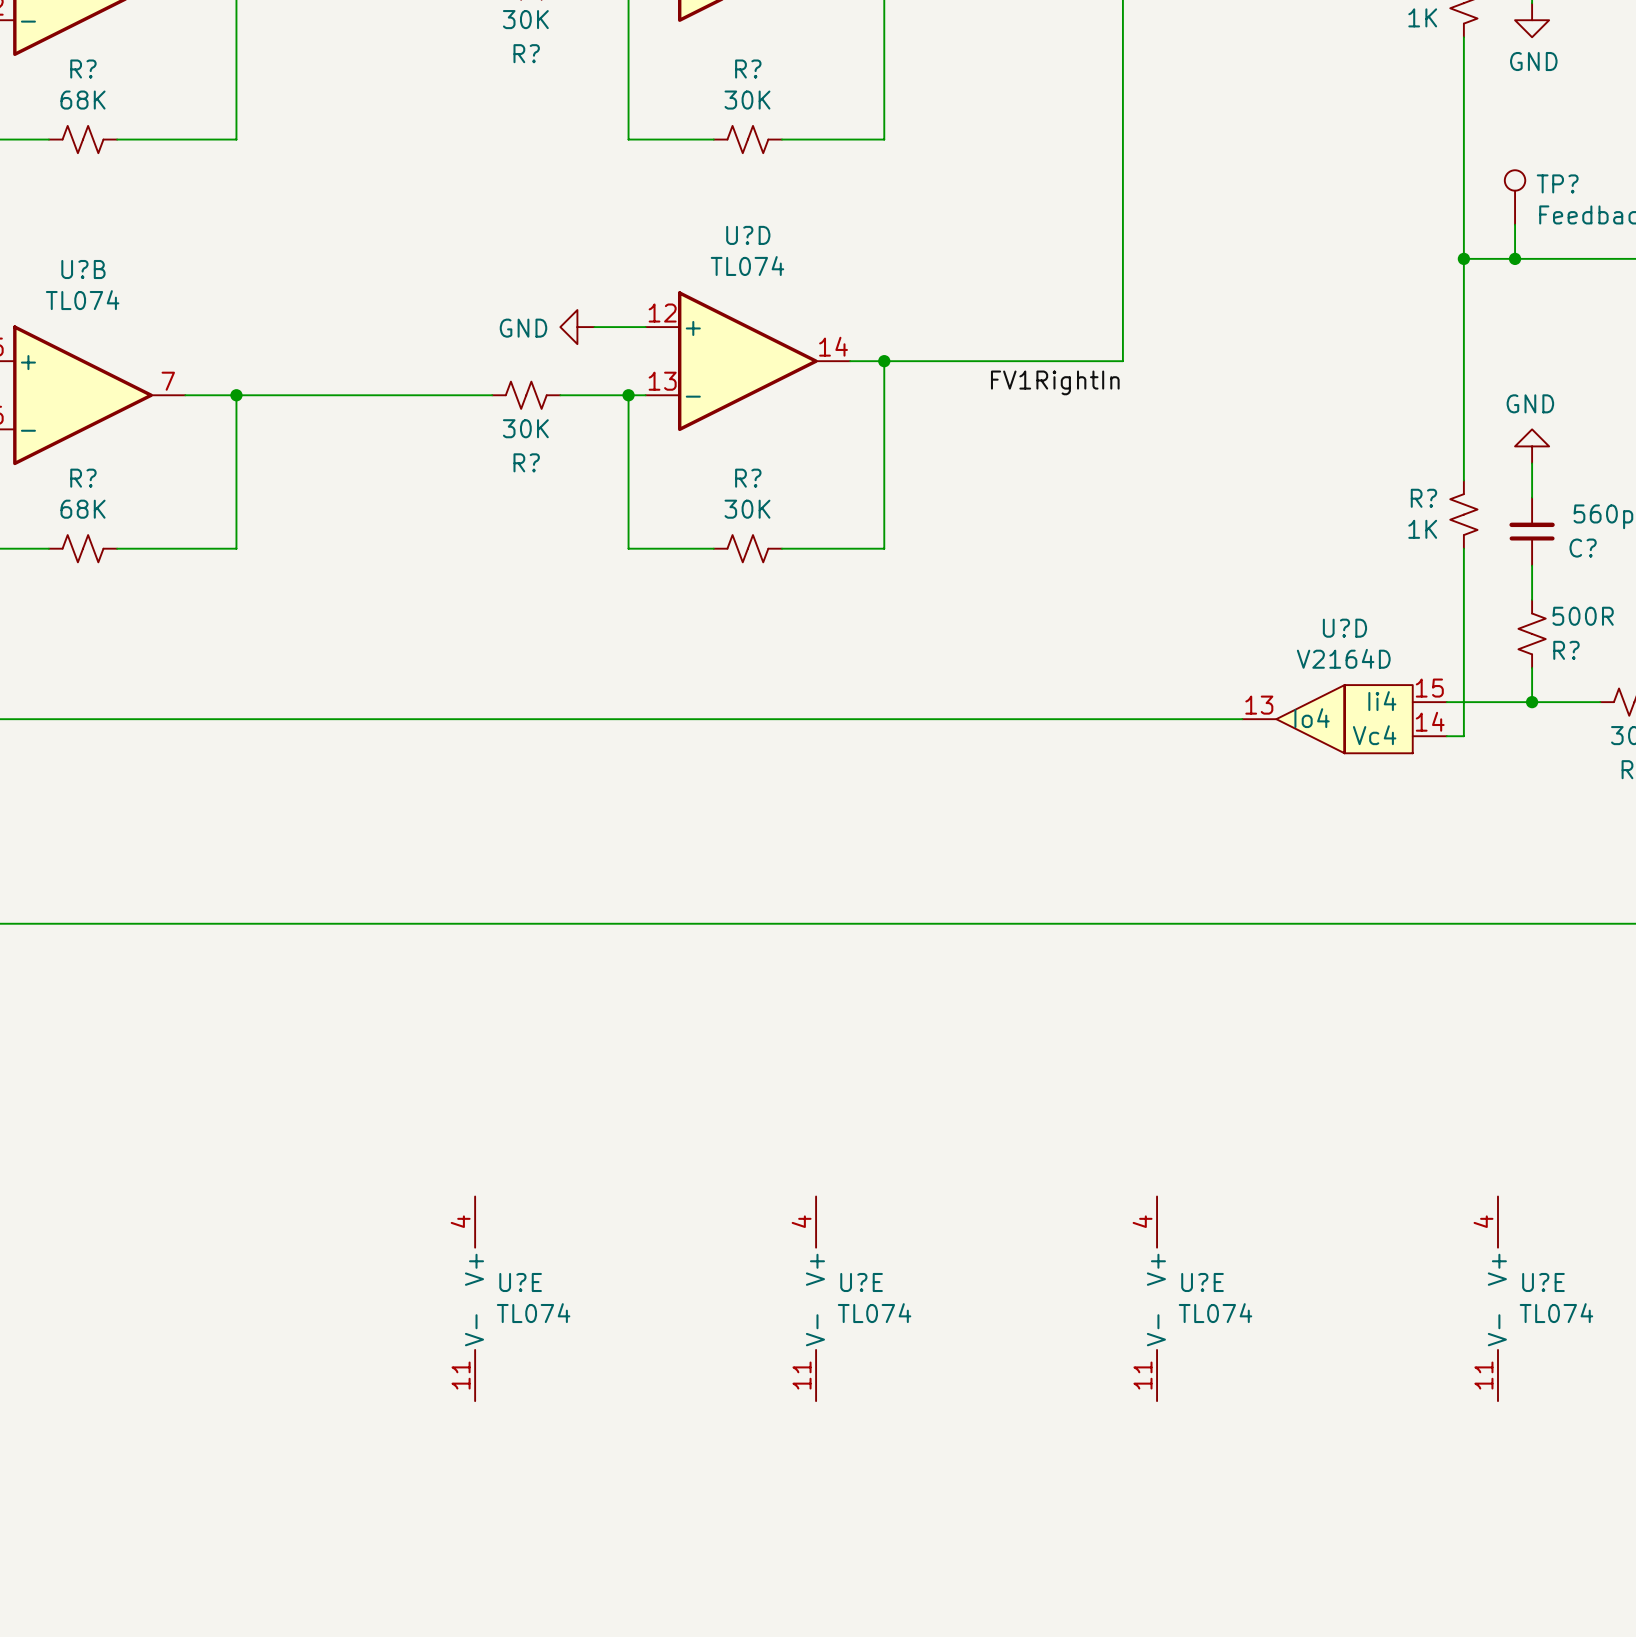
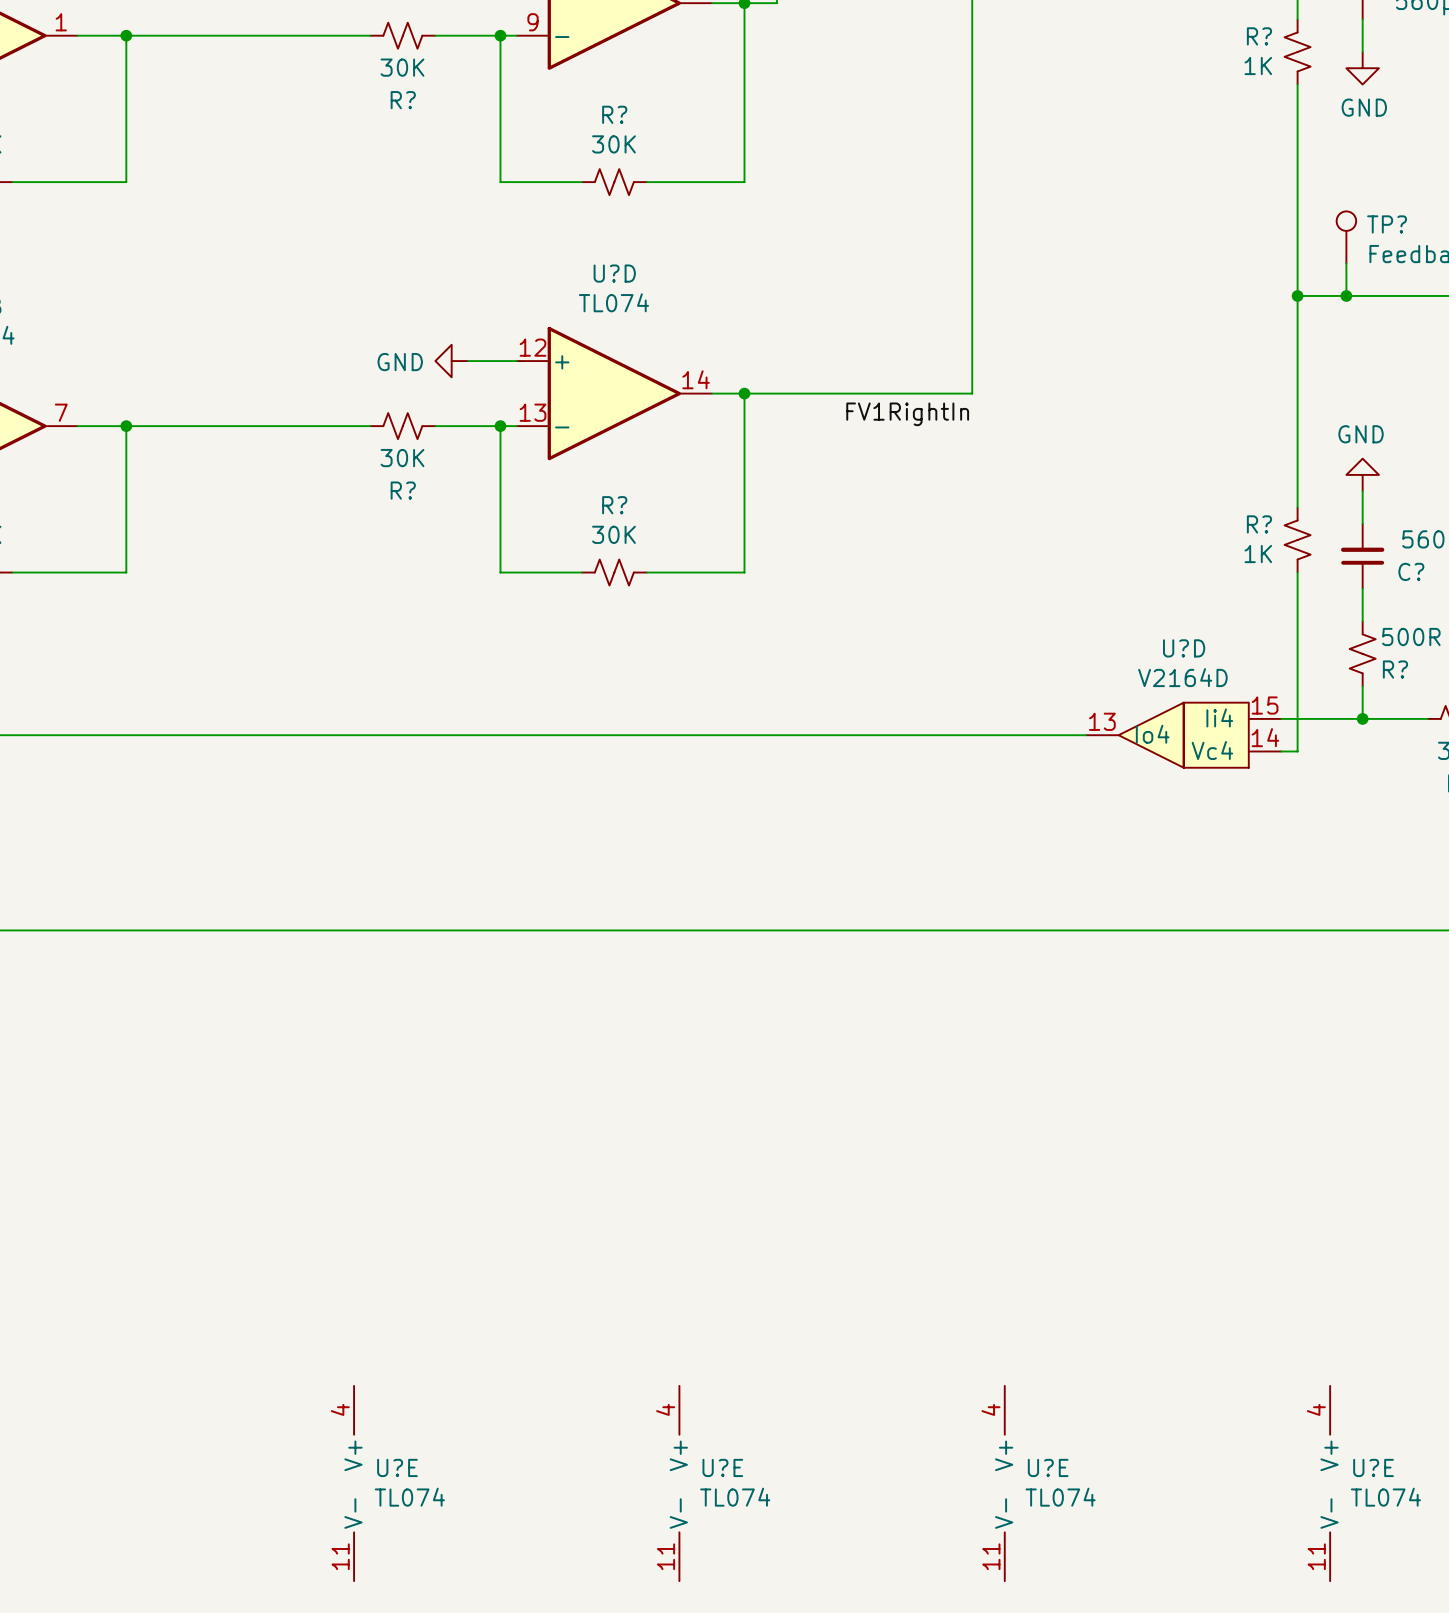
U?E: TL074 (475, 1298) -> none
U?E: TL074 (816, 1298) -> none
U?E: TL074 (1157, 1298) -> none
U?E: TL074 (1497, 1298) -> none
U?E: none -> TL074 (354, 1483)
U?E: none -> TL074 (679, 1483)
U?E: none -> TL074 (1004, 1483)
U?E: none -> TL074 (1330, 1483)

